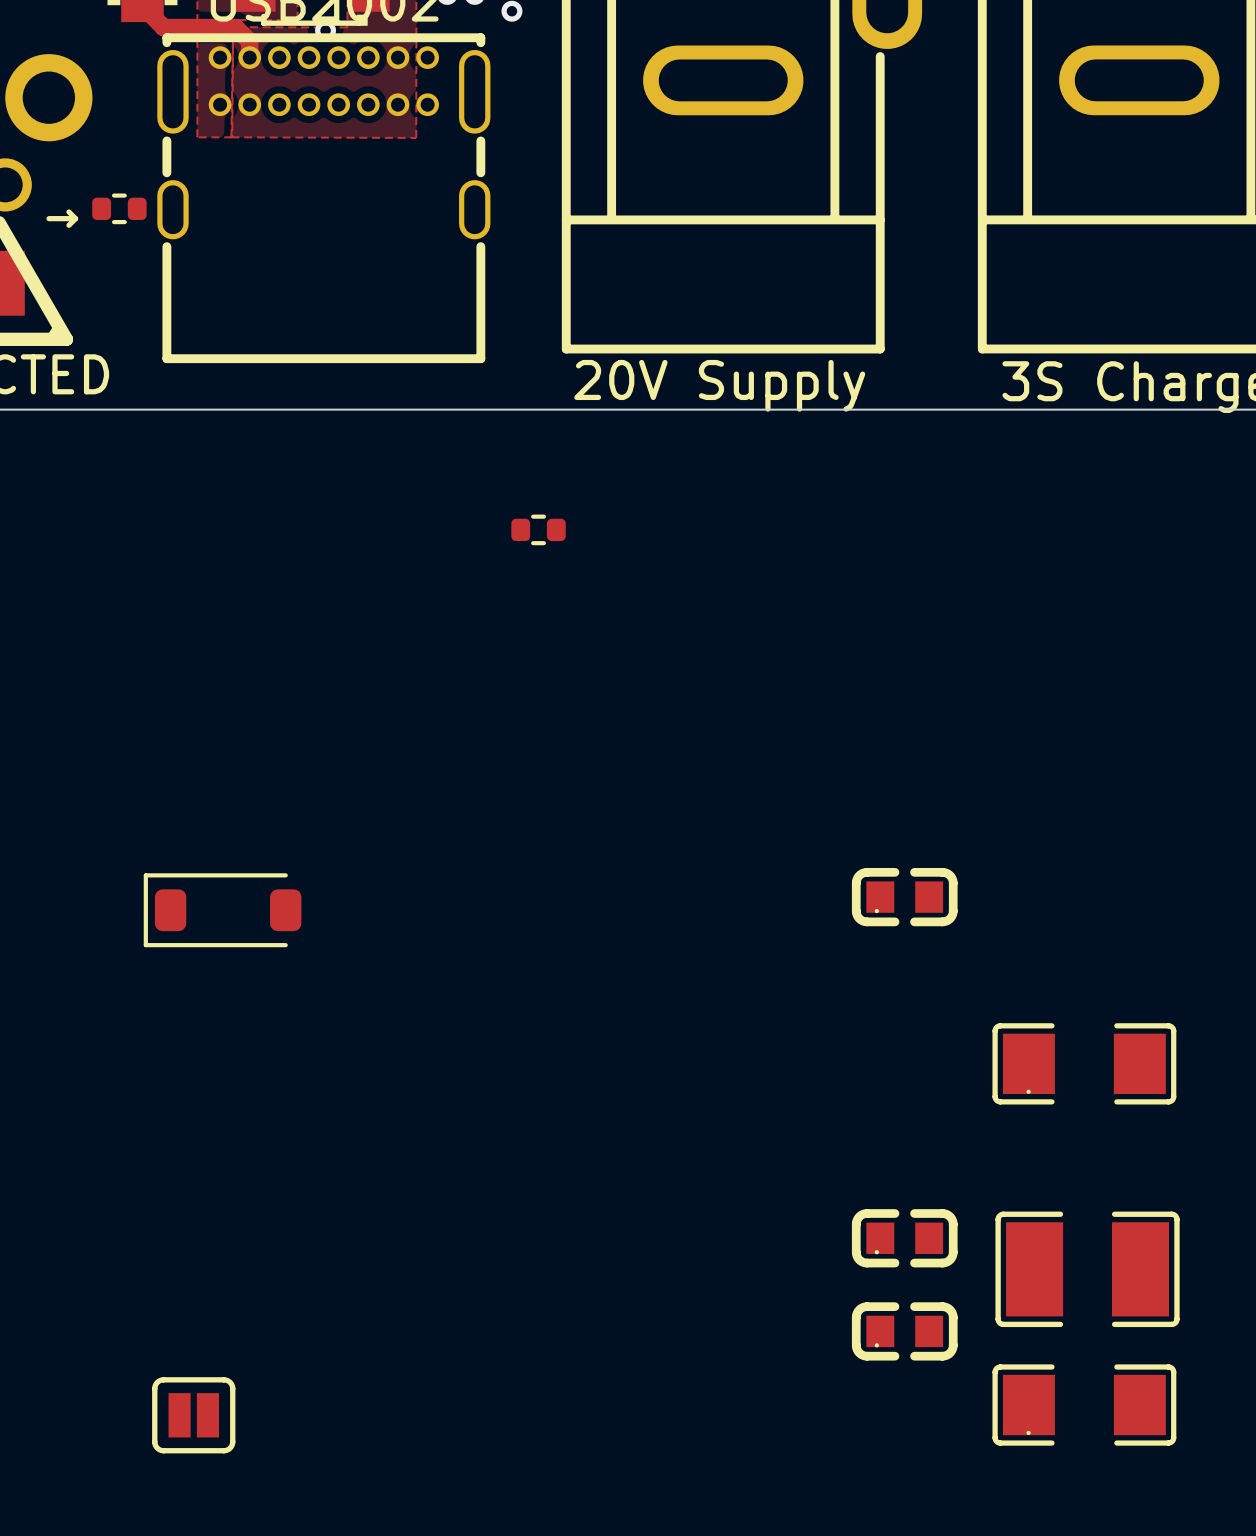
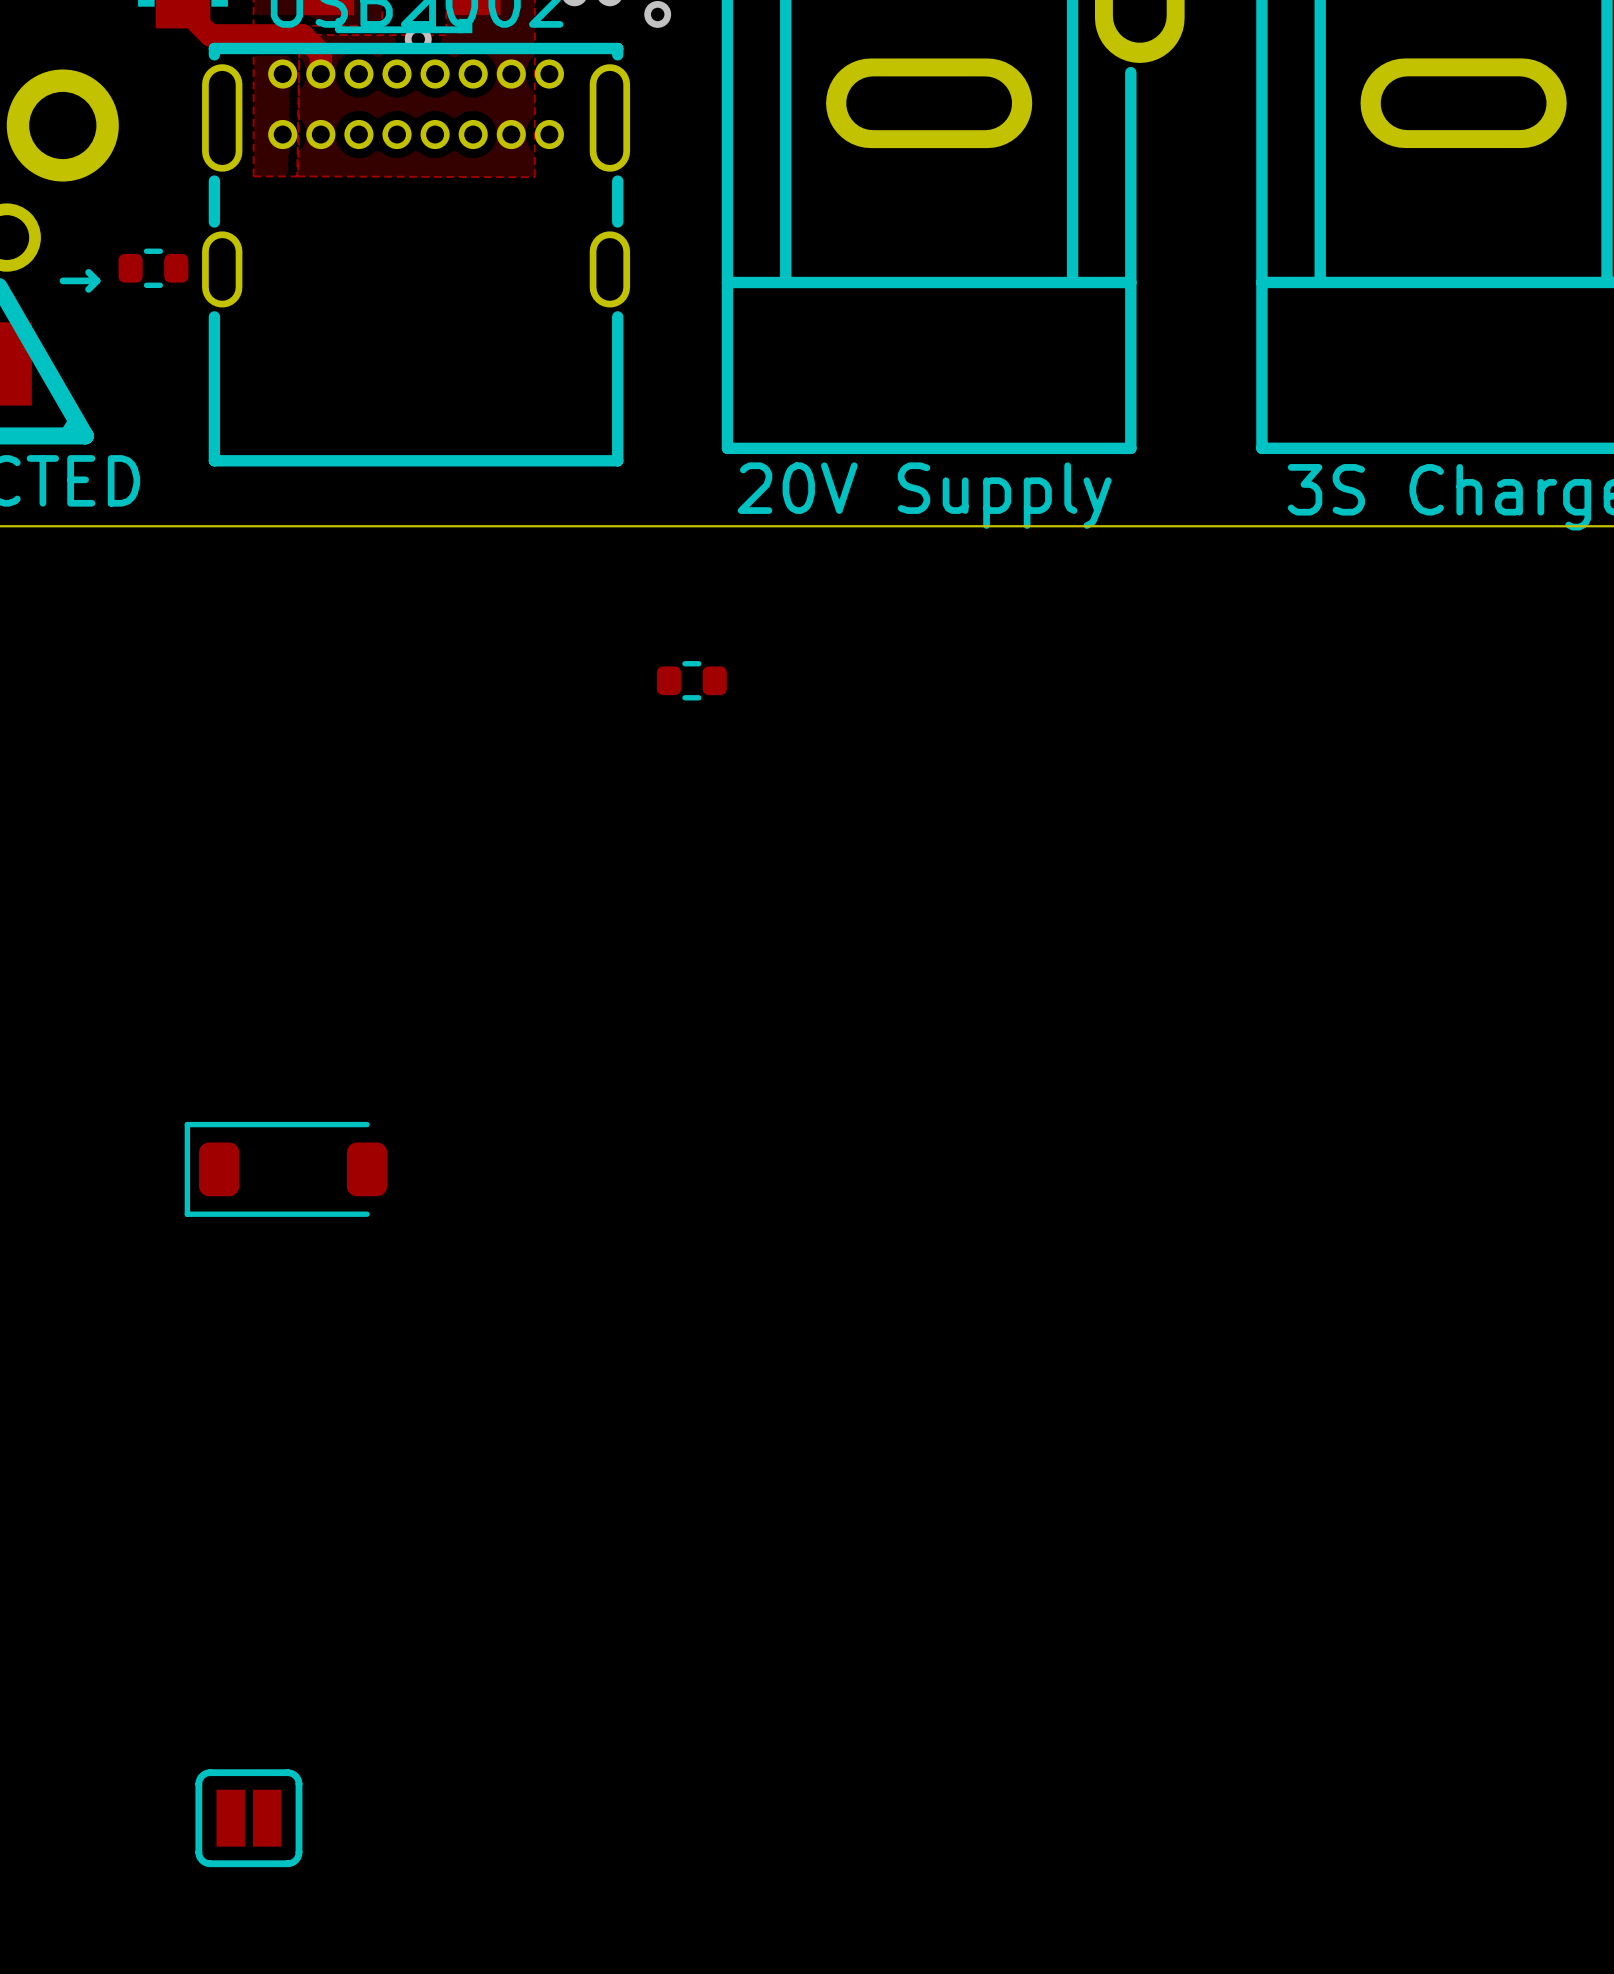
part: (904, 897) -> none
part: (1084, 1063) -> none
part: (904, 1238) -> none
part: (1087, 1269) -> none
part: (904, 1331) -> none
part: (1084, 1405) -> none

